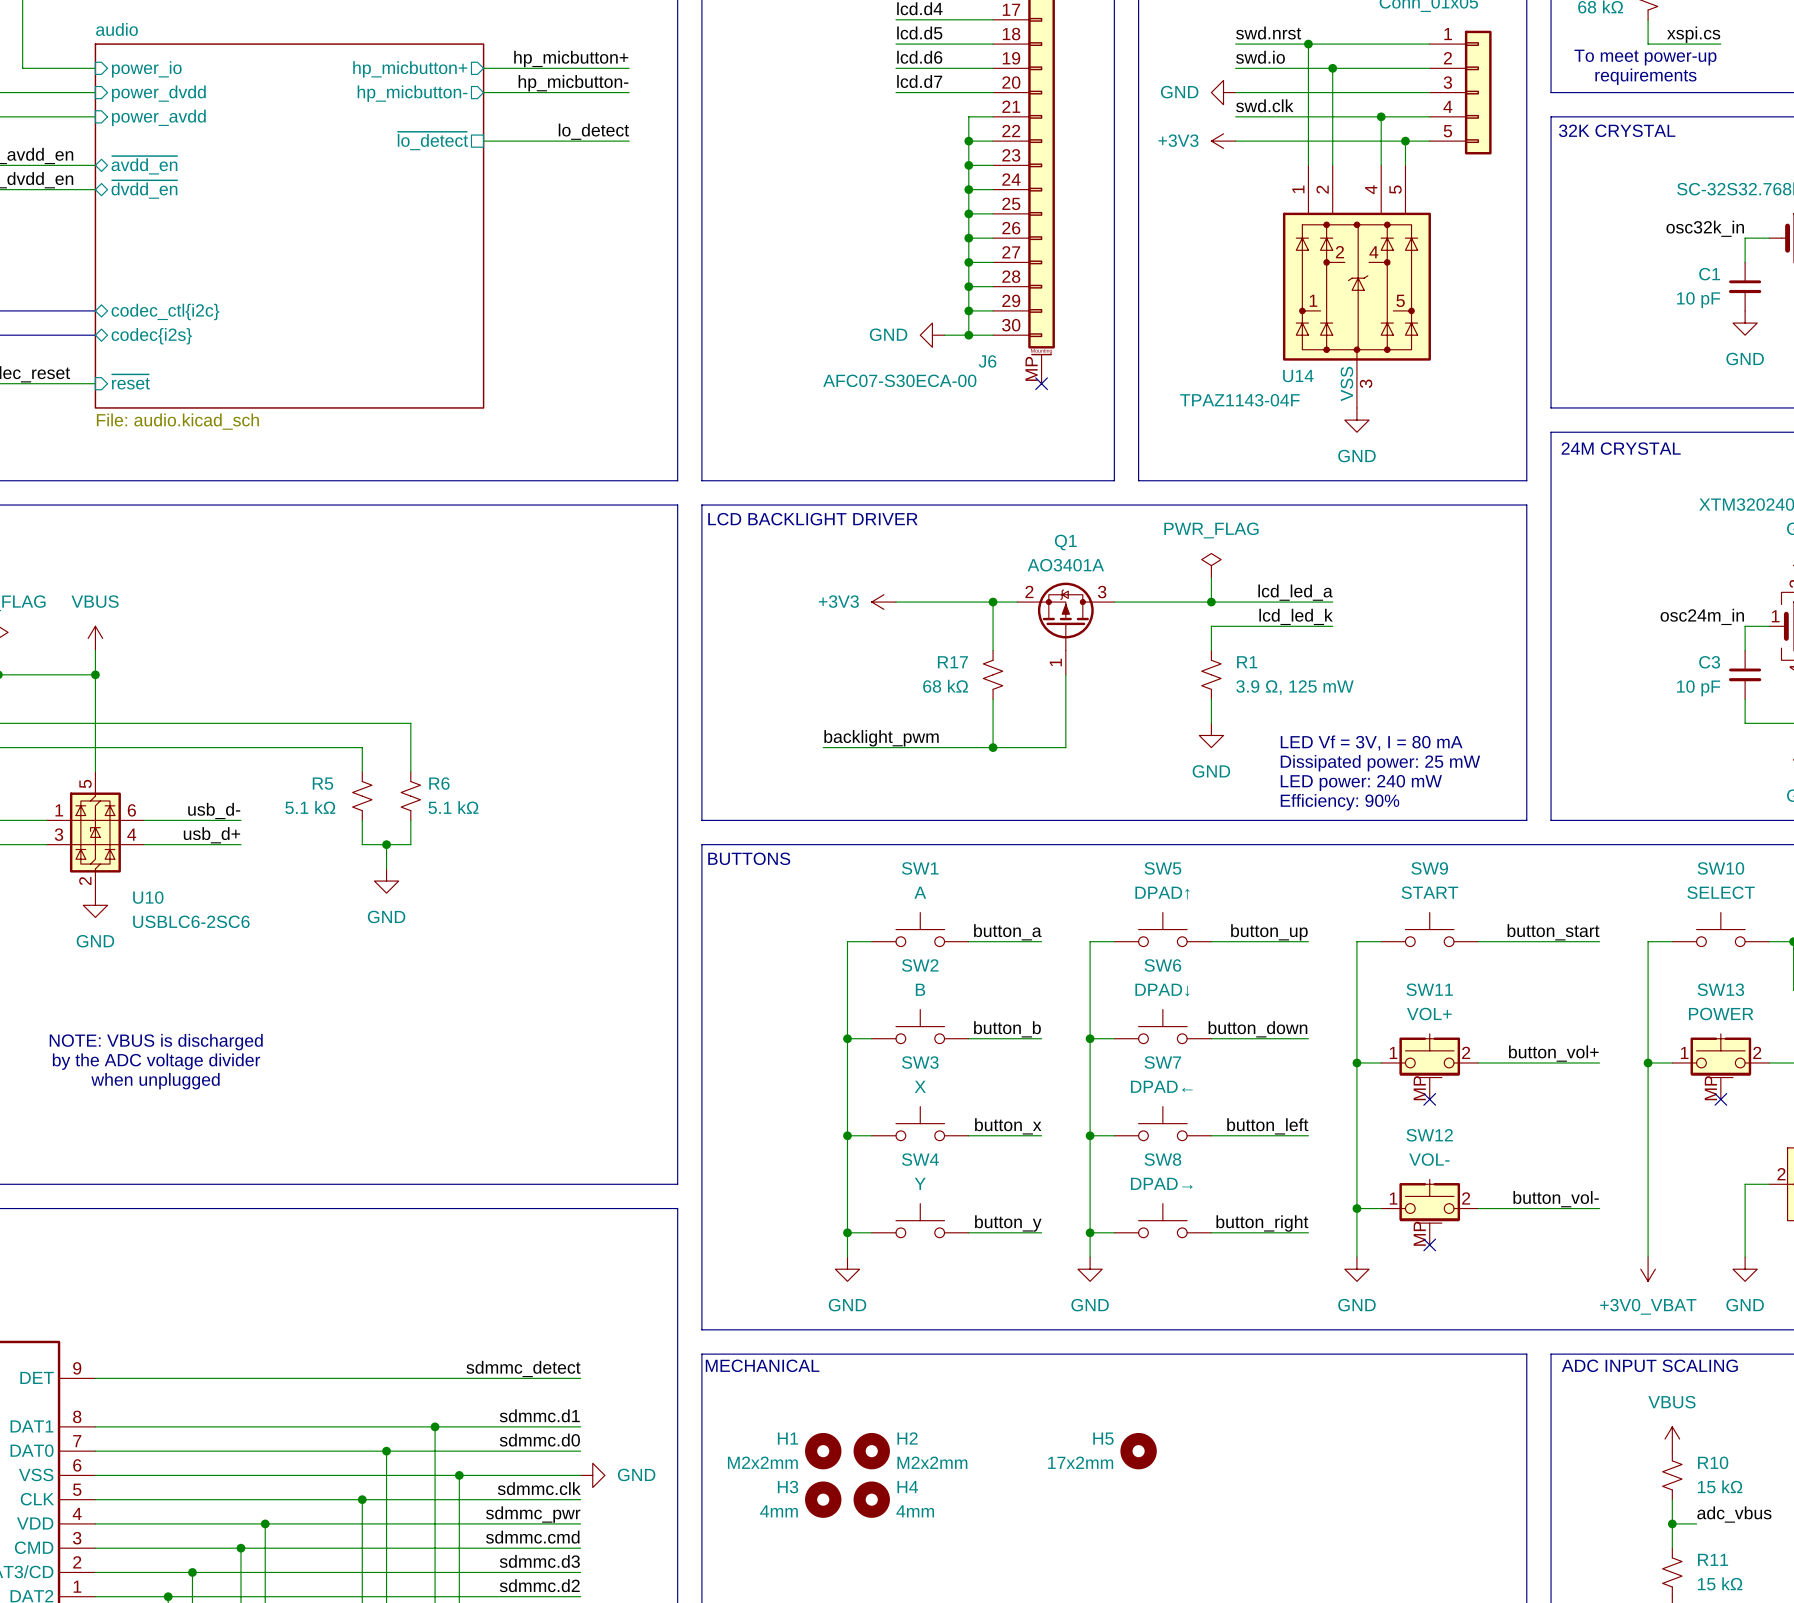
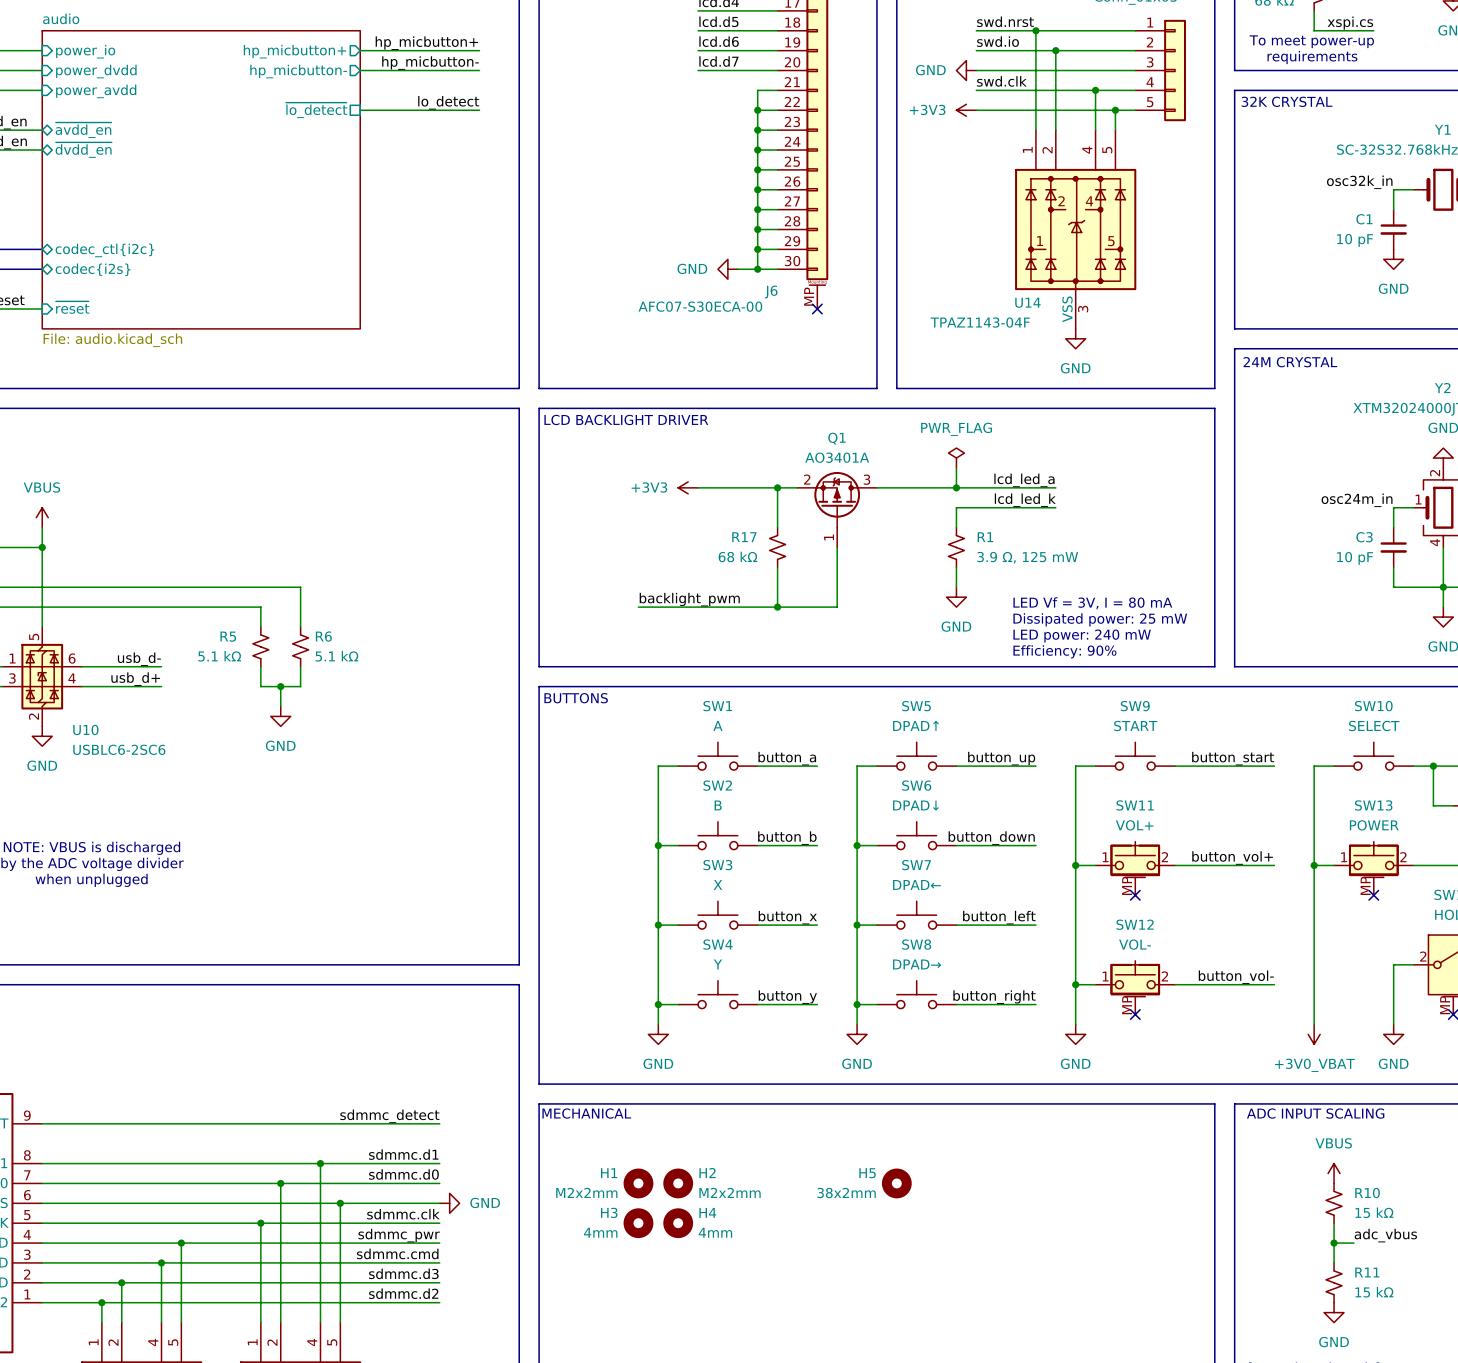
H5 value: 17x2mm (1080, 1462) -> 38x2mm (846, 1193)

